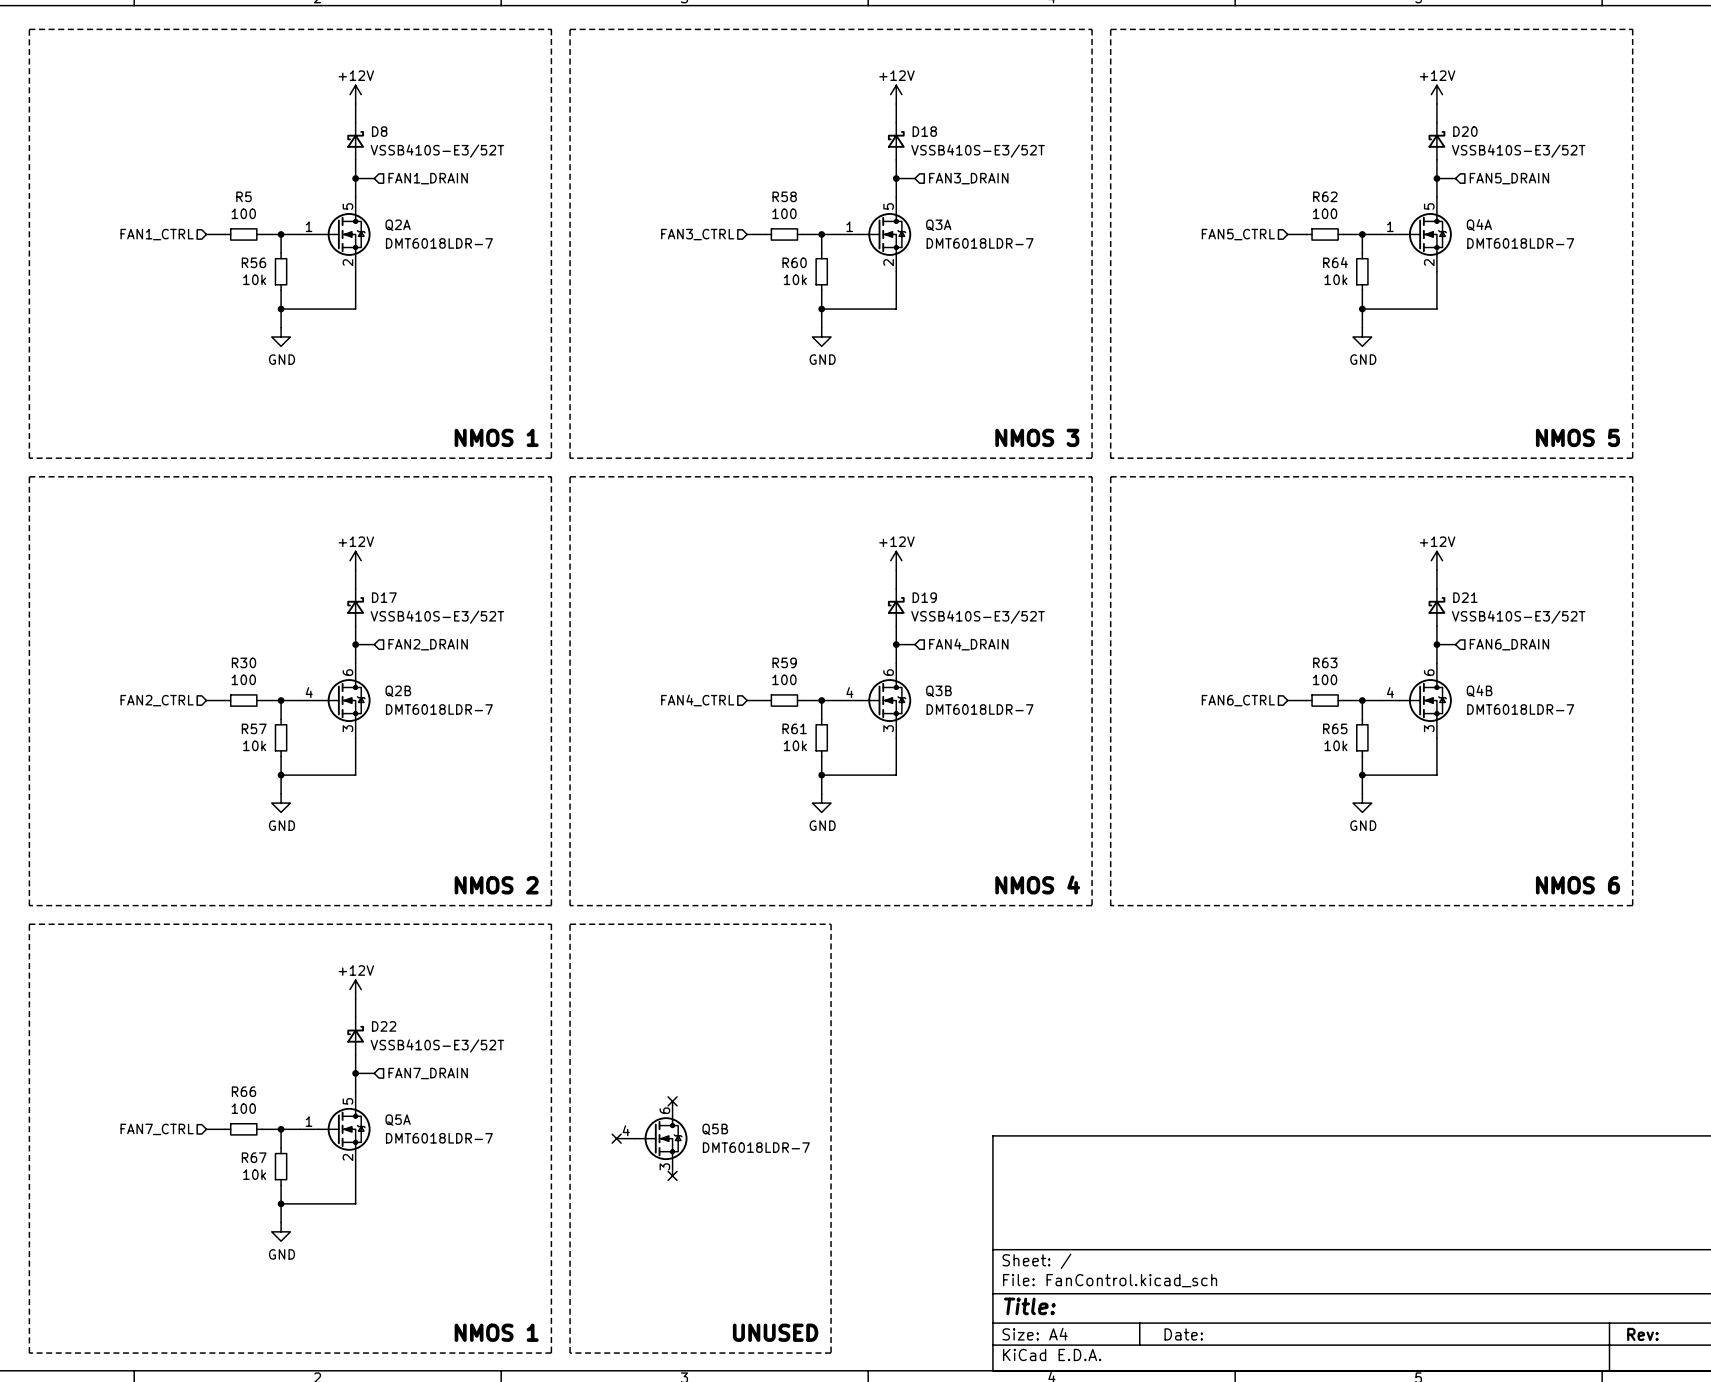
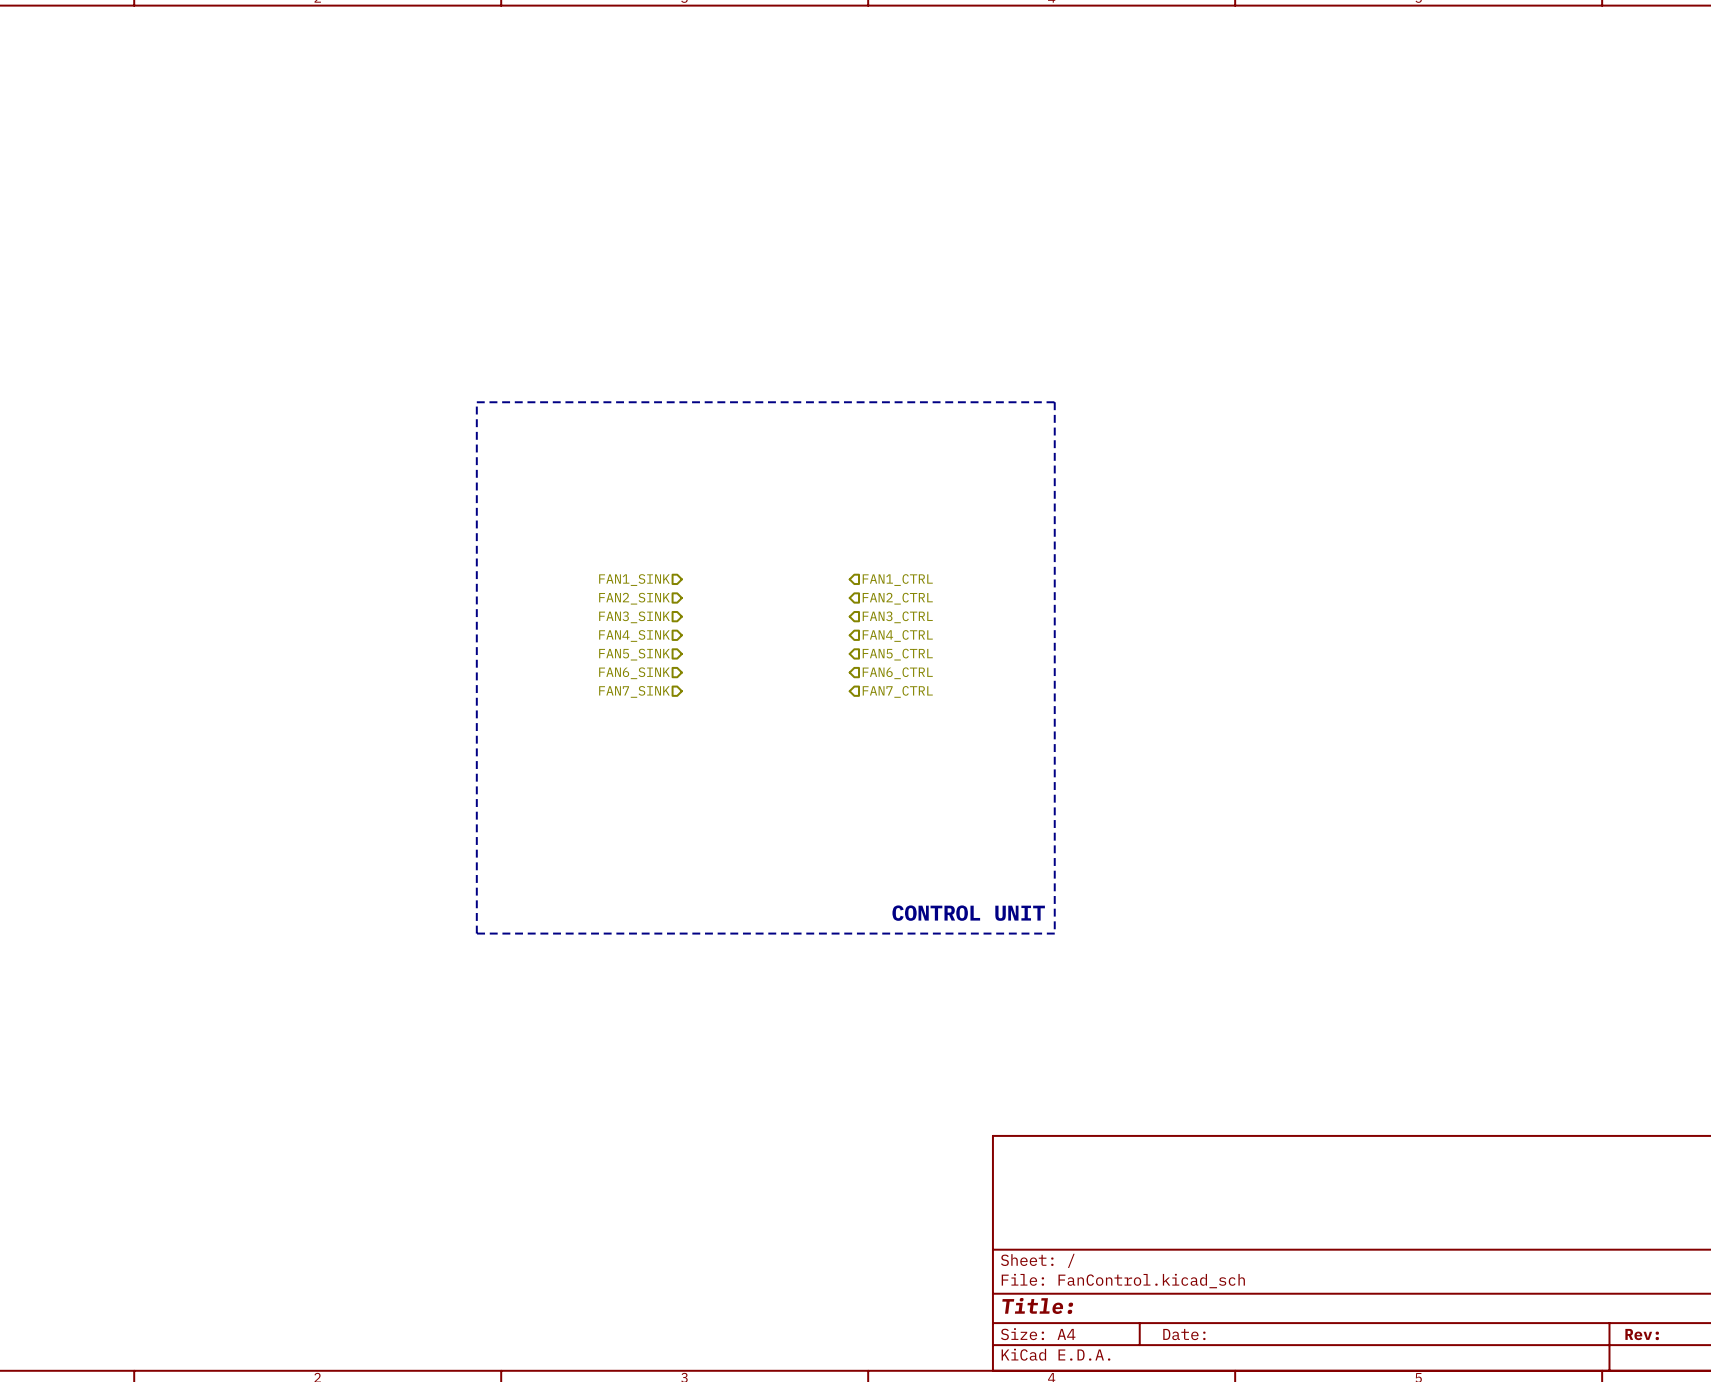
line: (29, 29) (29, 458) (551, 458) (551, 29) (29, 29) -> none
line: (570, 29) (1092, 29) (1092, 458) (570, 458) (570, 29) -> none
line: (1110, 29) (1110, 458) (1632, 458) (1632, 29) (1110, 29) -> none
power symbol: +12V (355, 94) -> none
power symbol: +12V (896, 94) -> none
power symbol: +12V (1436, 94) -> none
wire: (355, 103) (355, 122) -> none
wire: (896, 103) (896, 122) -> none
wire: (1436, 103) (1436, 122) -> none
D8: VSSB410S-E3/52T (355, 141) -> none
D18: VSSB410S-E3/52T (896, 141) -> none
D20: VSSB410S-E3/52T (1436, 141) -> none
wire: (355, 159) (355, 197) -> none
wire: (896, 159) (896, 197) -> none
wire: (1436, 159) (1436, 197) -> none
wire: (355, 178) (374, 178) -> none
junction: (355, 178) -> none
hierarchical label: FAN1_DRAIN (428, 178) -> none
wire: (896, 178) (914, 178) -> none
junction: (896, 178) -> none
hierarchical label: FAN3_DRAIN (968, 178) -> none
wire: (1436, 178) (1455, 178) -> none
junction: (1436, 178) -> none
hierarchical label: FAN5_DRAIN (1509, 178) -> none
hierarchical label: FAN1_CTRL (157, 234) -> none
wire: (206, 234) (225, 234) -> none
R5: 100 (243, 234) -> none
wire: (262, 234) (299, 234) -> none
wire: (281, 234) (281, 253) -> none
junction: (281, 234) -> none
Q2A: DMT6018LDR-7 (335, 234) -> none
hierarchical label: FAN3_CTRL (697, 234) -> none
wire: (747, 234) (765, 234) -> none
R58: 100 (784, 234) -> none
wire: (803, 234) (840, 234) -> none
wire: (821, 234) (821, 253) -> none
junction: (821, 234) -> none
Q3A: DMT6018LDR-7 (875, 234) -> none
hierarchical label: FAN5_CTRL (1238, 234) -> none
wire: (1287, 234) (1306, 234) -> none
R62: 100 (1325, 234) -> none
wire: (1343, 234) (1381, 234) -> none
wire: (1362, 234) (1362, 253) -> none
junction: (1362, 234) -> none
Q4A: DMT6018LDR-7 (1416, 234) -> none
R56: 10k (281, 271) -> none
wire: (355, 271) (355, 309) (281, 309) -> none
R60: 10k (821, 271) -> none
wire: (896, 271) (896, 309) (821, 309) -> none
R64: 10k (1362, 271) -> none
wire: (1436, 271) (1436, 309) (1362, 309) -> none
wire: (281, 290) (281, 327) -> none
wire: (821, 290) (821, 327) -> none
wire: (1362, 290) (1362, 327) -> none
junction: (281, 309) -> none
junction: (821, 309) -> none
junction: (1362, 309) -> none
power symbol: GND (281, 337) -> none
power symbol: GND (821, 337) -> none
power symbol: GND (1362, 337) -> none
text: NMOS 1 (496, 437) -> none
text: NMOS 3 (1037, 437) -> none
text: NMOS 5 (1577, 437) -> none
line: (29, 476) (551, 476) (551, 905) (29, 905) (29, 476) -> none
line: (570, 476) (1092, 476) (1092, 905) (570, 905) (570, 476) -> (476, 402) (476, 933) (1054, 933) (1054, 402) (476, 402)
line: (1110, 476) (1632, 476) (1632, 905) (1110, 905) (1110, 476) -> none
power symbol: +12V (355, 560) -> none
power symbol: +12V (896, 560) -> none
power symbol: +12V (1436, 560) -> none
wire: (355, 570) (355, 588) -> none
wire: (896, 570) (896, 588) -> none
wire: (1436, 570) (1436, 588) -> none
hierarchical label: none -> FAN1_SINK (634, 580)
hierarchical label: none -> FAN1_CTRL (897, 580)
hierarchical label: none -> FAN2_SINK (634, 598)
hierarchical label: none -> FAN2_CTRL (897, 598)
D17: VSSB410S-E3/52T (355, 607) -> none
D19: VSSB410S-E3/52T (896, 607) -> none
D21: VSSB410S-E3/52T (1436, 607) -> none
hierarchical label: none -> FAN3_SINK (634, 617)
hierarchical label: none -> FAN3_CTRL (897, 617)
wire: (355, 625) (355, 663) -> none
wire: (896, 625) (896, 663) -> none
wire: (1436, 625) (1436, 663) -> none
hierarchical label: none -> FAN4_SINK (634, 635)
wire: (355, 644) (374, 644) -> none
junction: (355, 644) -> none
hierarchical label: FAN2_DRAIN (428, 644) -> none
wire: (896, 644) (914, 644) -> none
junction: (896, 644) -> none
hierarchical label: FAN4_DRAIN (968, 644) -> none
wire: (1436, 644) (1455, 644) -> none
junction: (1436, 644) -> none
hierarchical label: FAN6_DRAIN (1509, 644) -> none
hierarchical label: none -> FAN5_SINK (634, 654)
hierarchical label: none -> FAN5_CTRL (897, 654)
hierarchical label: none -> FAN6_SINK (634, 673)
hierarchical label: none -> FAN6_CTRL (897, 673)
hierarchical label: none -> FAN7_SINK (634, 691)
hierarchical label: none -> FAN7_CTRL (897, 691)
hierarchical label: FAN2_CTRL (157, 700) -> none
wire: (206, 700) (225, 700) -> none
R30: 100 (243, 700) -> none
wire: (262, 700) (299, 700) -> none
wire: (281, 700) (281, 719) -> none
junction: (281, 700) -> none
Q2B: DMT6018LDR-7 (335, 700) -> none
hierarchical label rotation: 0° (697, 700) -> 180° (897, 635)
hierarchical label position: FAN4_CTRL (697, 700) -> FAN4_CTRL (897, 635)
wire: (747, 700) (765, 700) -> none
R59: 100 (784, 700) -> none
wire: (803, 700) (840, 700) -> none
wire: (821, 700) (821, 719) -> none
junction: (821, 700) -> none
Q3B: DMT6018LDR-7 (875, 700) -> none
hierarchical label: FAN6_CTRL (1238, 700) -> none
wire: (1287, 700) (1306, 700) -> none
R63: 100 (1325, 700) -> none
wire: (1343, 700) (1381, 700) -> none
wire: (1362, 700) (1362, 719) -> none
junction: (1362, 700) -> none
Q4B: DMT6018LDR-7 (1416, 700) -> none
R57: 10k (281, 737) -> none
wire: (355, 737) (355, 775) (281, 775) -> none
R61: 10k (821, 737) -> none
wire: (896, 737) (896, 775) (821, 775) -> none
R65: 10k (1362, 737) -> none
wire: (1436, 737) (1436, 775) (1362, 775) -> none
wire: (281, 756) (281, 793) -> none
wire: (821, 756) (821, 793) -> none
wire: (1362, 756) (1362, 793) -> none
junction: (281, 775) -> none
junction: (821, 775) -> none
junction: (1362, 775) -> none
power symbol: GND (281, 803) -> none
power symbol: GND (821, 803) -> none
power symbol: GND (1362, 803) -> none
text: NMOS 4 (1037, 884) -> none
text: NMOS 2 (496, 885) -> none
text: NMOS 6 (1577, 885) -> none
text: none -> CONTROL UNIT (968, 913)
line: (29, 924) (29, 1353) (551, 1353) (551, 924) (29, 924) -> none
line: (570, 924) (570, 1353) (831, 1353) (831, 924) (570, 924) -> none
power symbol: +12V (355, 989) -> none
wire: (355, 998) (355, 1017) -> none
D22: VSSB410S-E3/52T (355, 1036) -> none
wire: (355, 1054) (355, 1092) -> none
wire: (355, 1073) (374, 1073) -> none
junction: (355, 1073) -> none
hierarchical label: FAN7_DRAIN (428, 1073) -> none
no-connect mark: (672, 1101) -> none
hierarchical label: FAN7_CTRL (157, 1129) -> none
wire: (206, 1129) (225, 1129) -> none
R66: 100 (243, 1129) -> none
wire: (262, 1129) (299, 1129) -> none
wire: (281, 1129) (281, 1147) -> none
junction: (281, 1129) -> none
Q5A: DMT6018LDR-7 (335, 1129) -> none
no-connect mark: (616, 1138) -> none
Q5B: DMT6018LDR-7 (652, 1138) -> none
R67: 10k (281, 1166) -> none
wire: (355, 1166) (355, 1203) (281, 1203) -> none
no-connect mark: (672, 1175) -> none
wire: (281, 1185) (281, 1222) -> none
junction: (281, 1203) -> none
power symbol: GND (281, 1231) -> none
text: NMOS 1 (496, 1332) -> none
text: UNUSED (775, 1332) -> none

